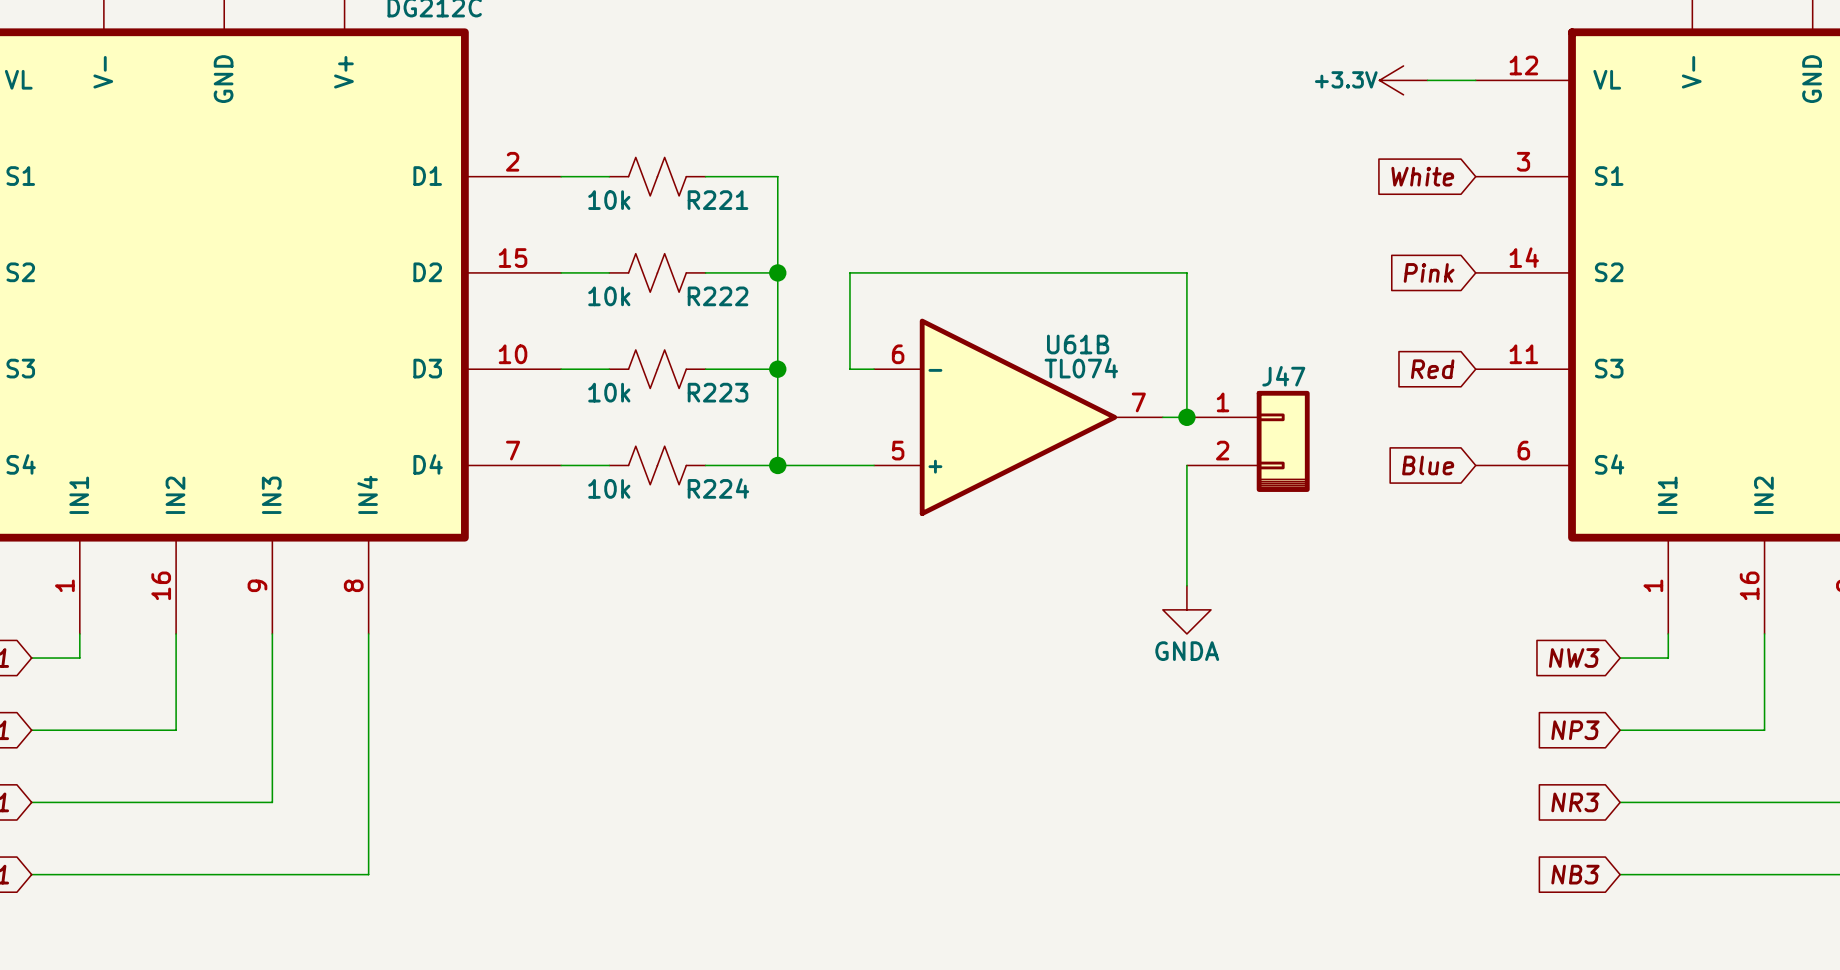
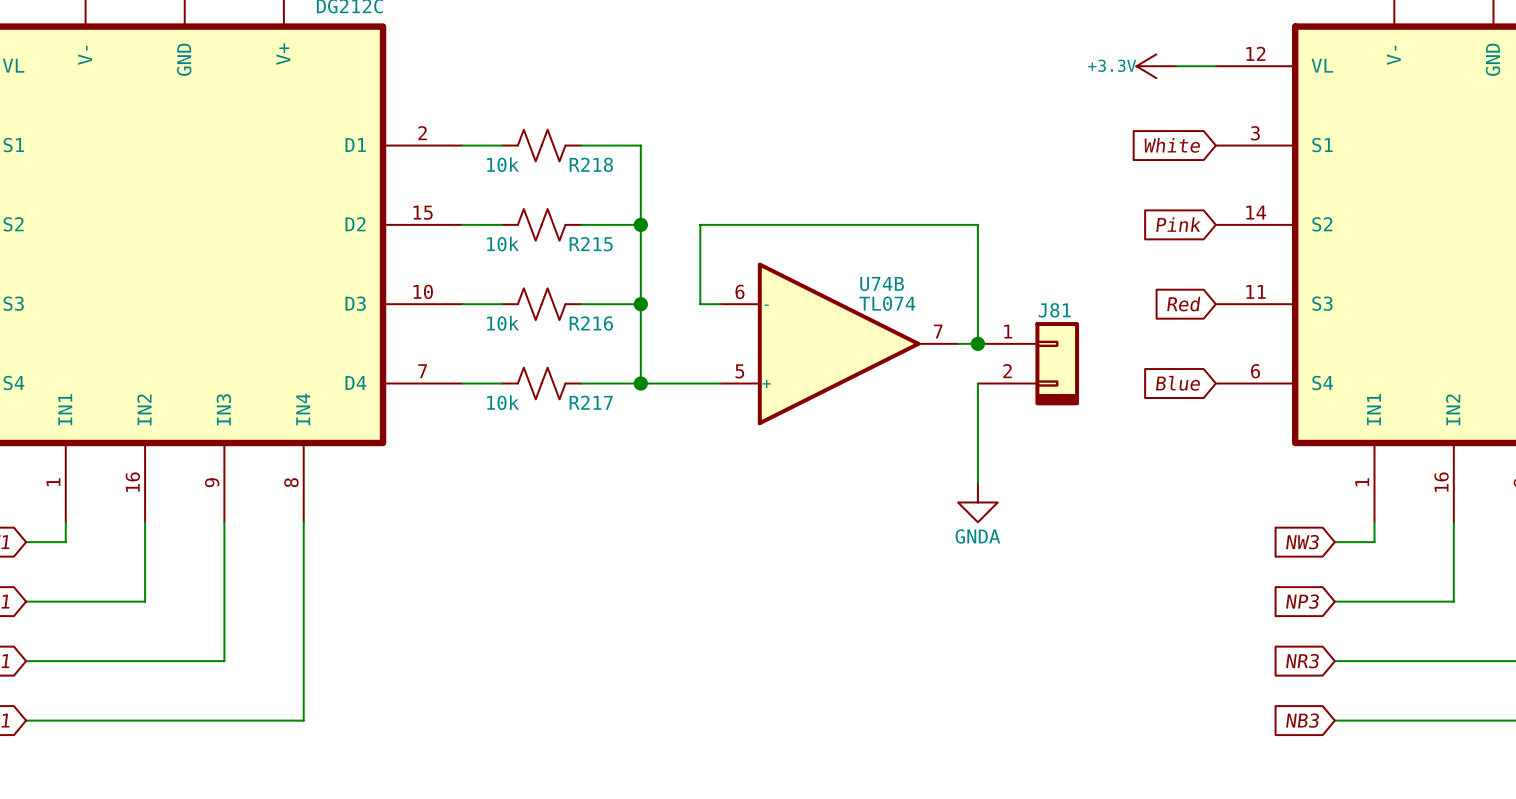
R221 name: R221 (718, 200) -> R218 (591, 164)
R222 name: R222 (718, 296) -> R215 (591, 244)
U61B name: U61B (1078, 344) -> U74B (882, 283)
J47 name: J47 (1283, 376) -> J81 (1054, 310)
R223 name: R223 (718, 392) -> R216 (591, 323)
R224 name: R224 (718, 488) -> R217 (591, 402)

